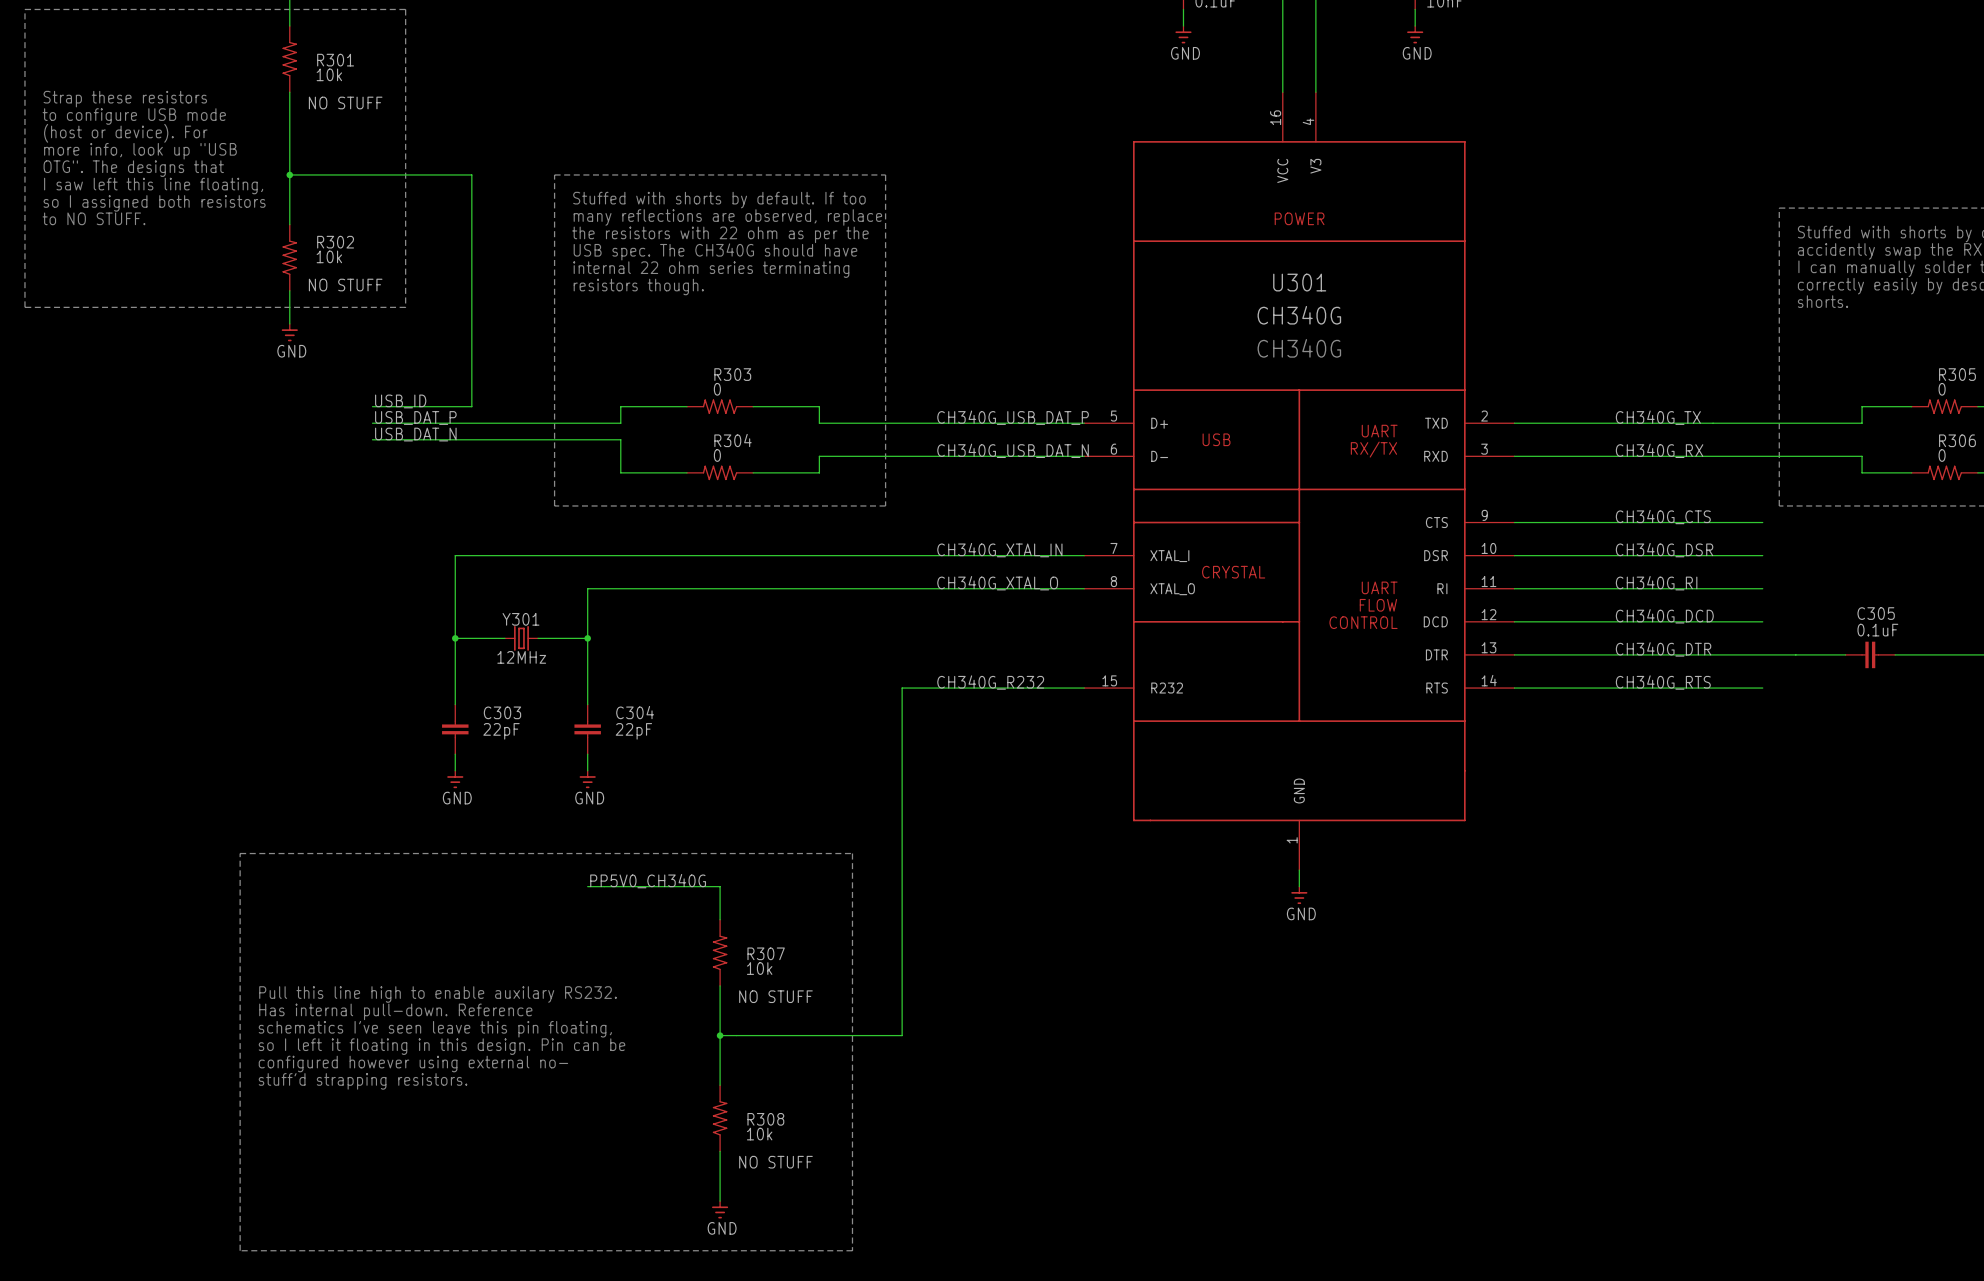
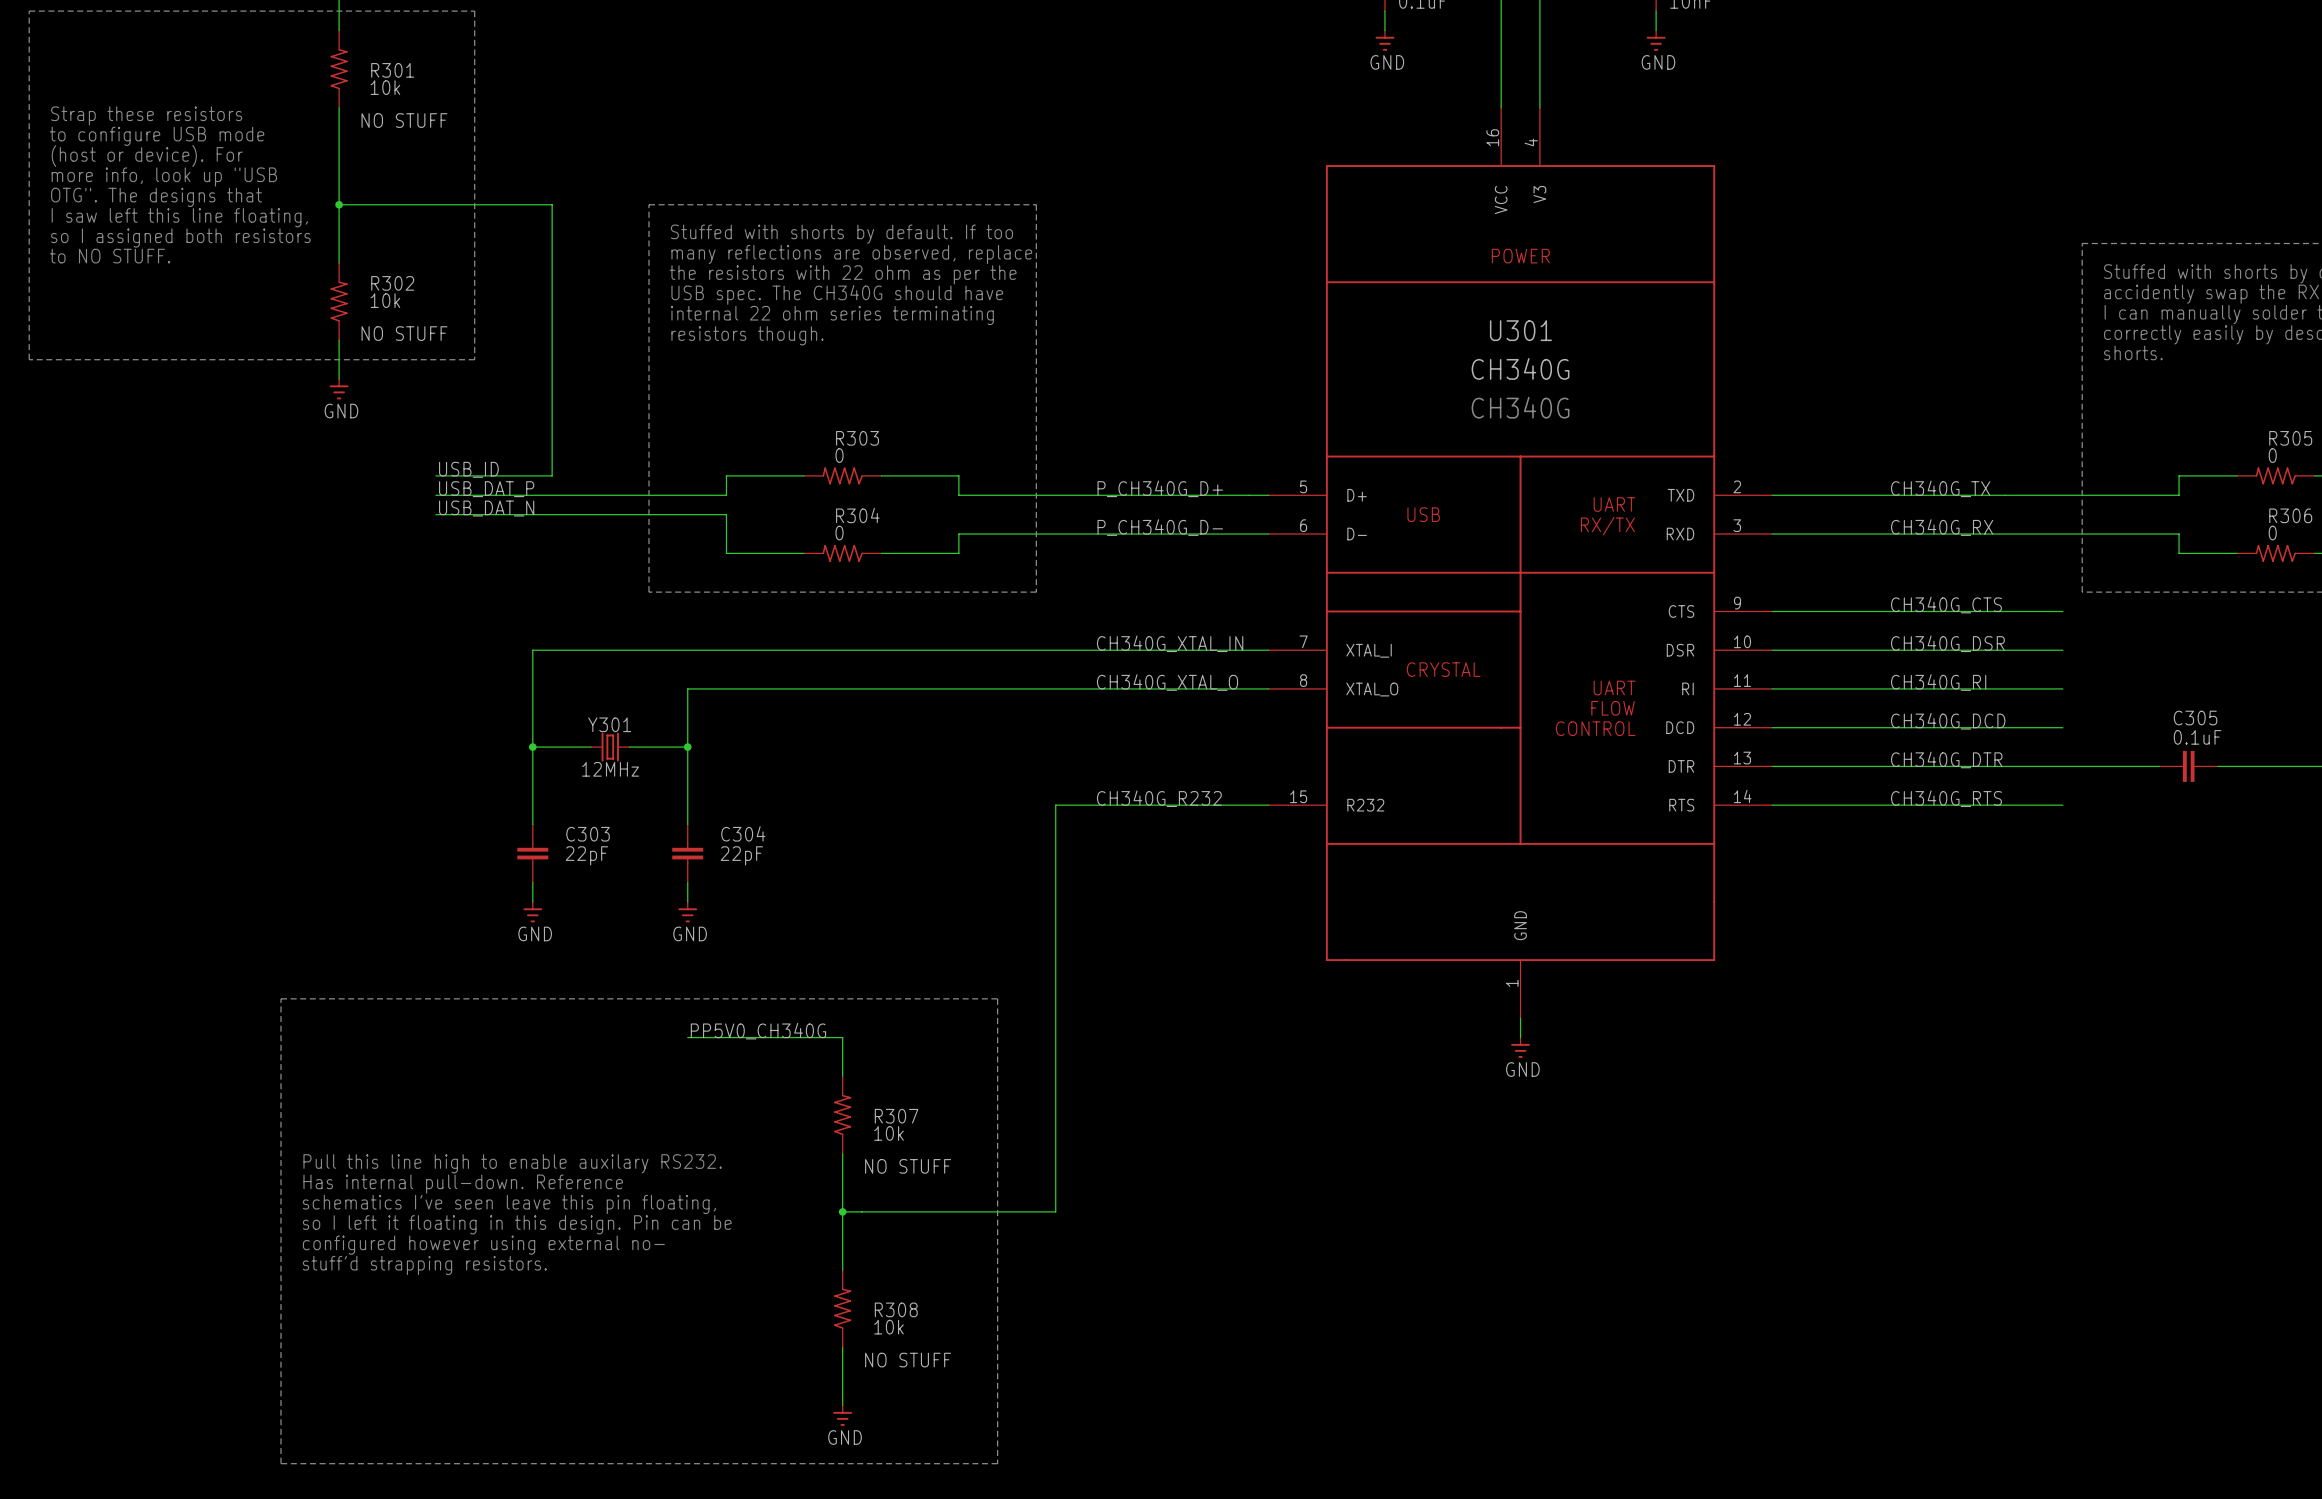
label: CH340G_USB_DAT_P (1013, 417) -> P_CH340G_D+ (1160, 488)
label: CH340G_USB_DAT_N (1013, 450) -> P_CH340G_D- (1160, 527)

